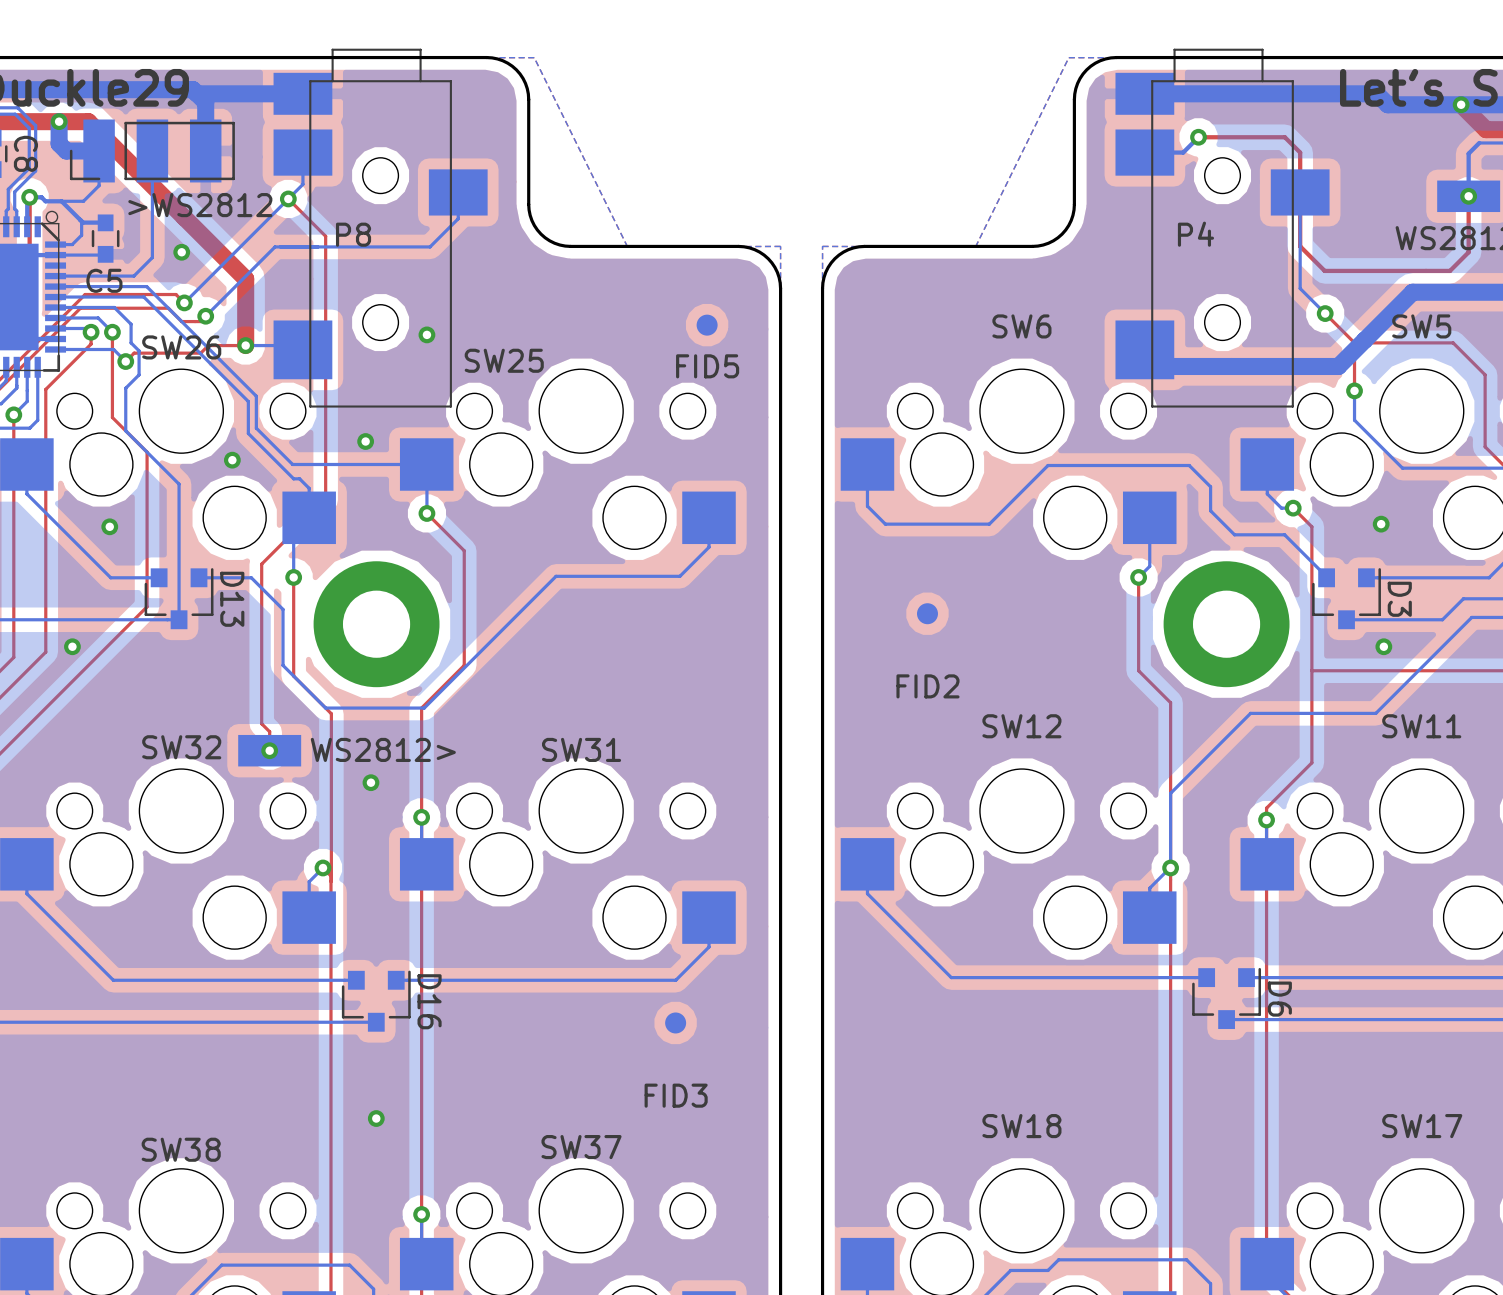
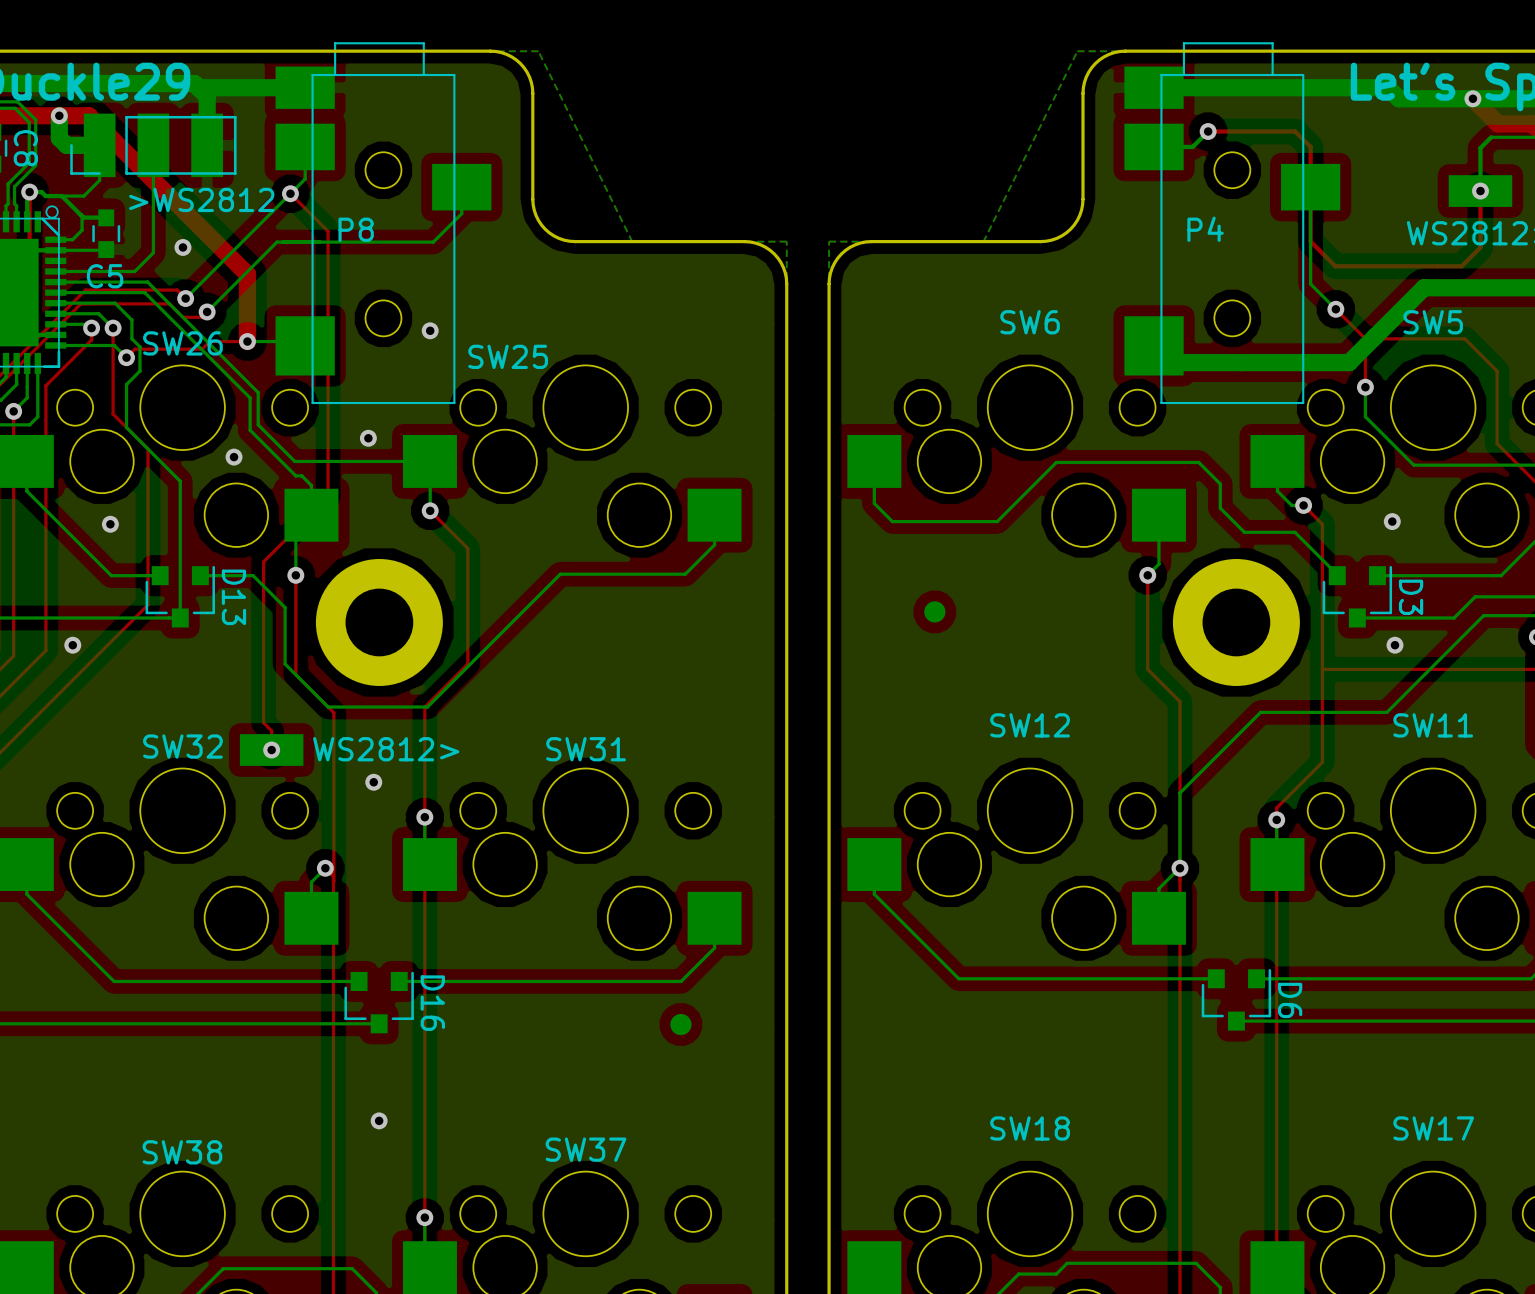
FID5: (707, 325) -> none
FID2 name: FID2 (927, 686) -> none
FID3 name: FID3 (676, 1095) -> none

